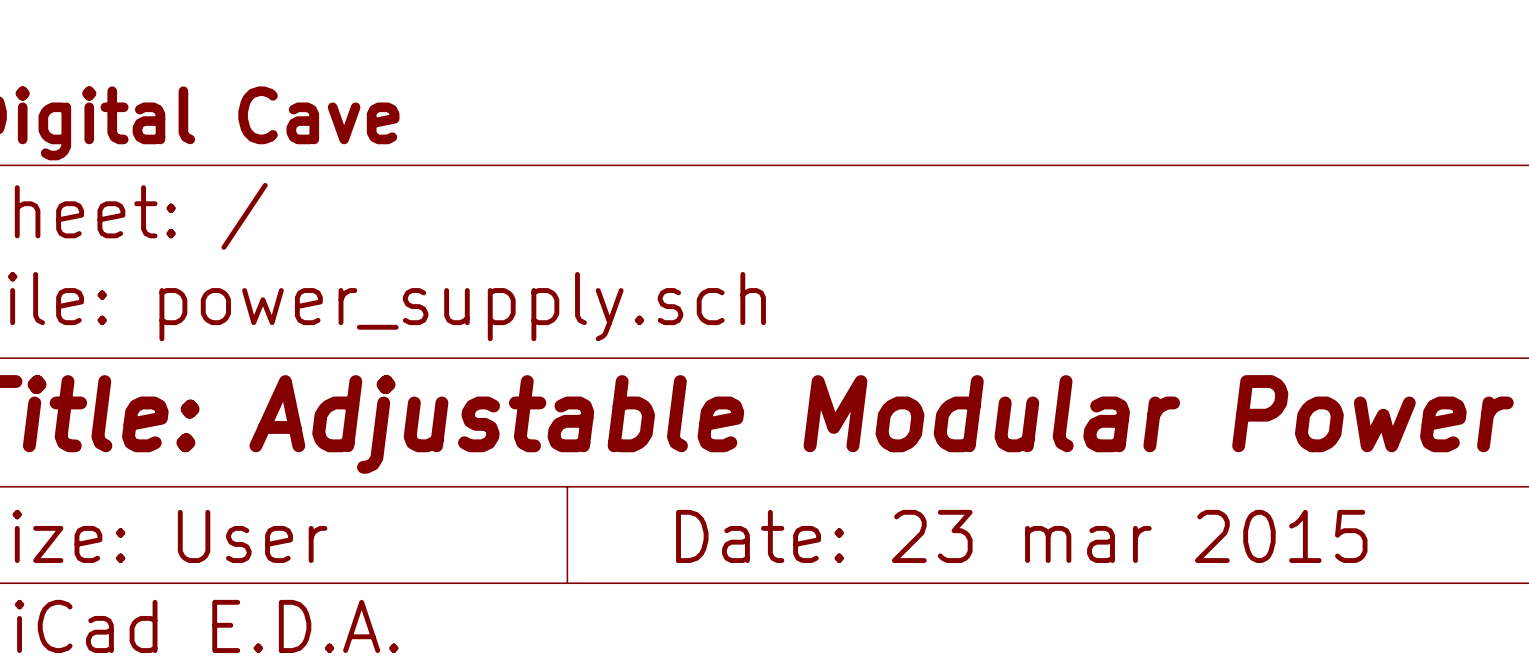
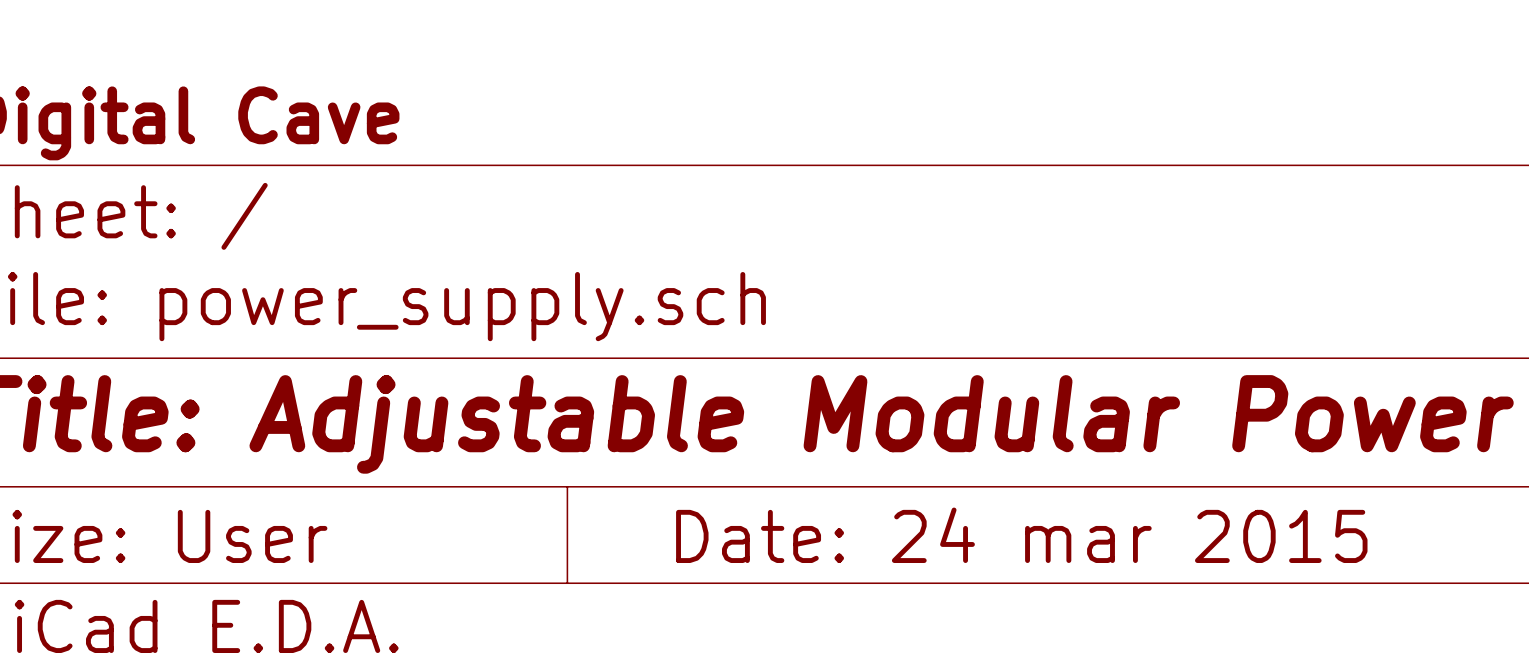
title block: Date: 23 mar 2015 (1021, 536) -> Date: 24 mar 2015 (1021, 535)

